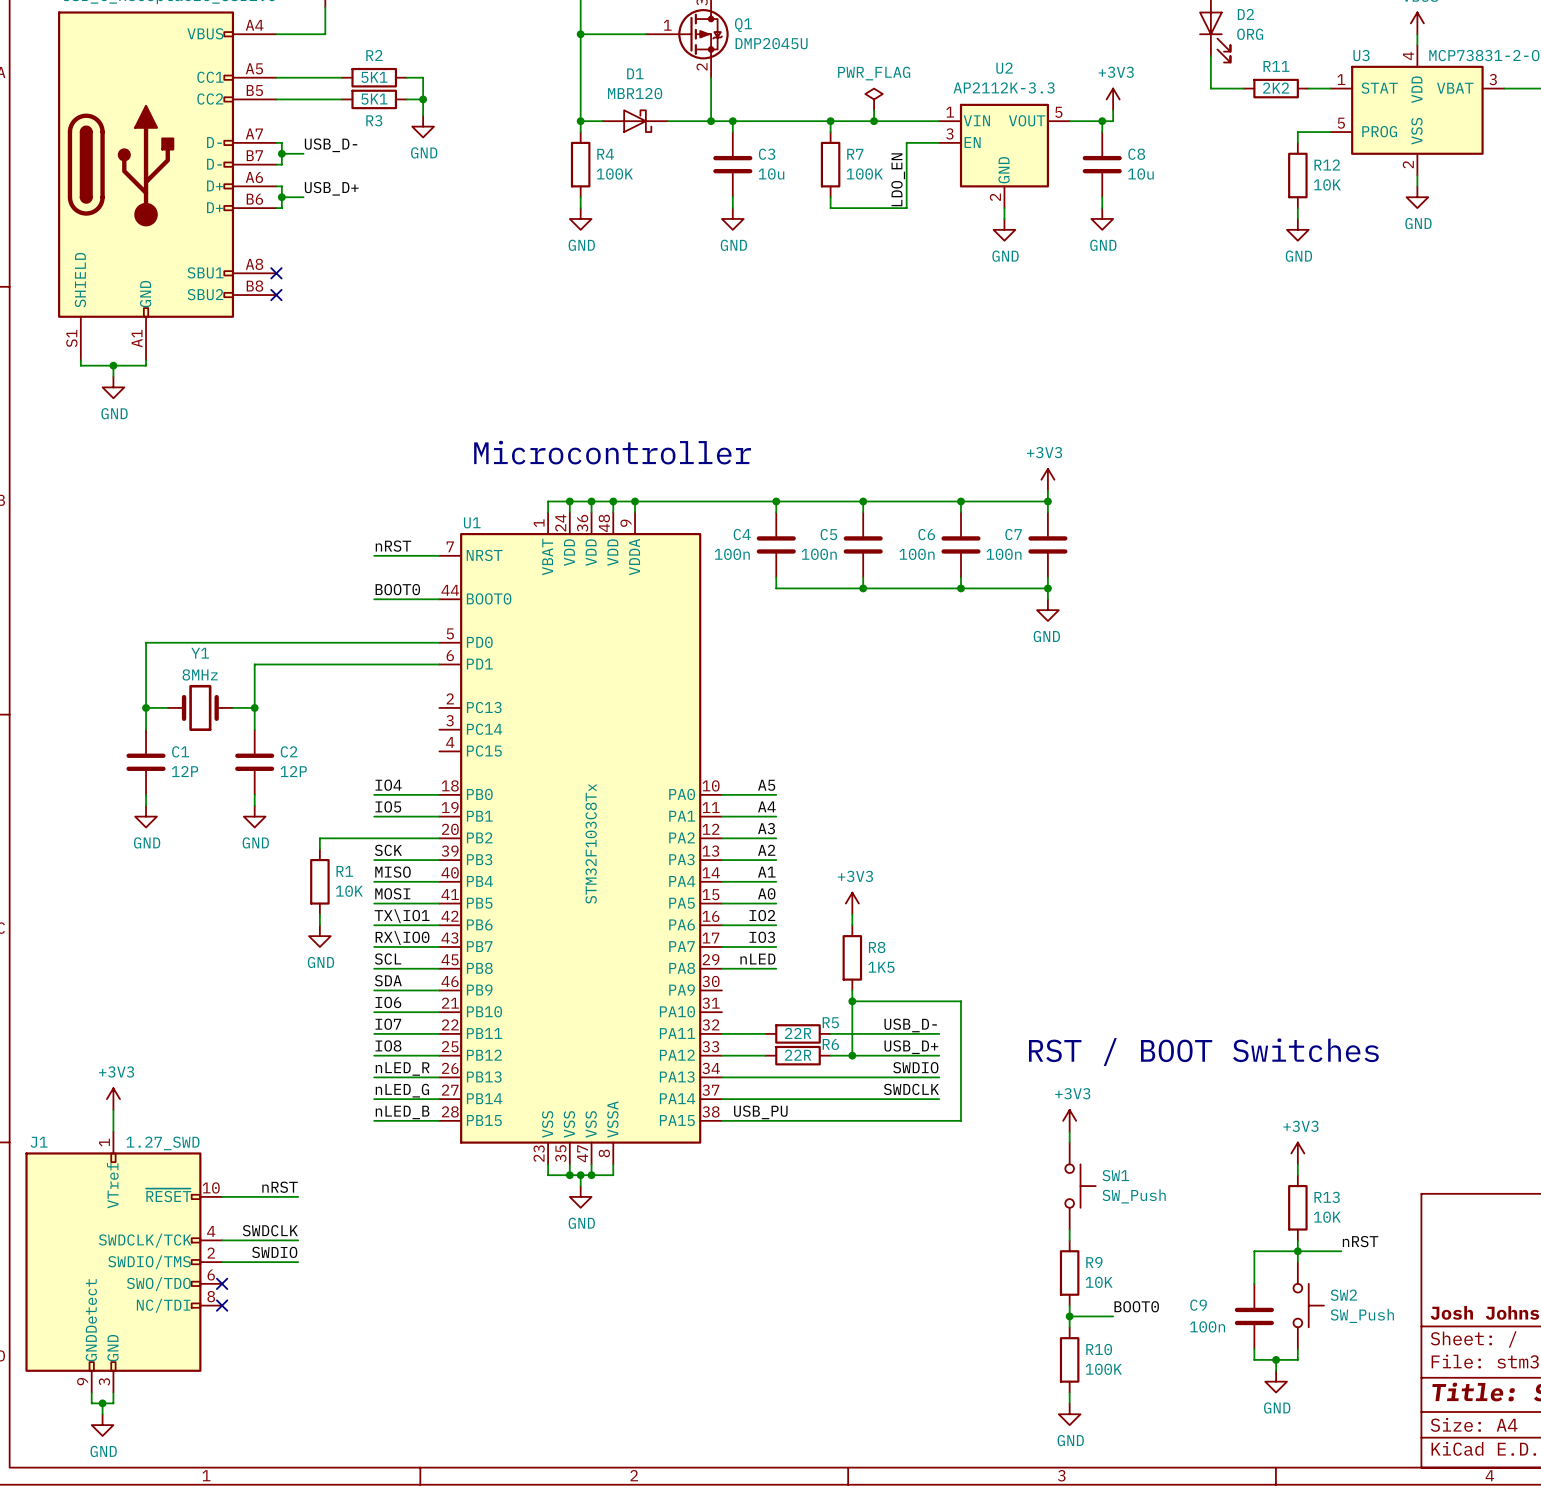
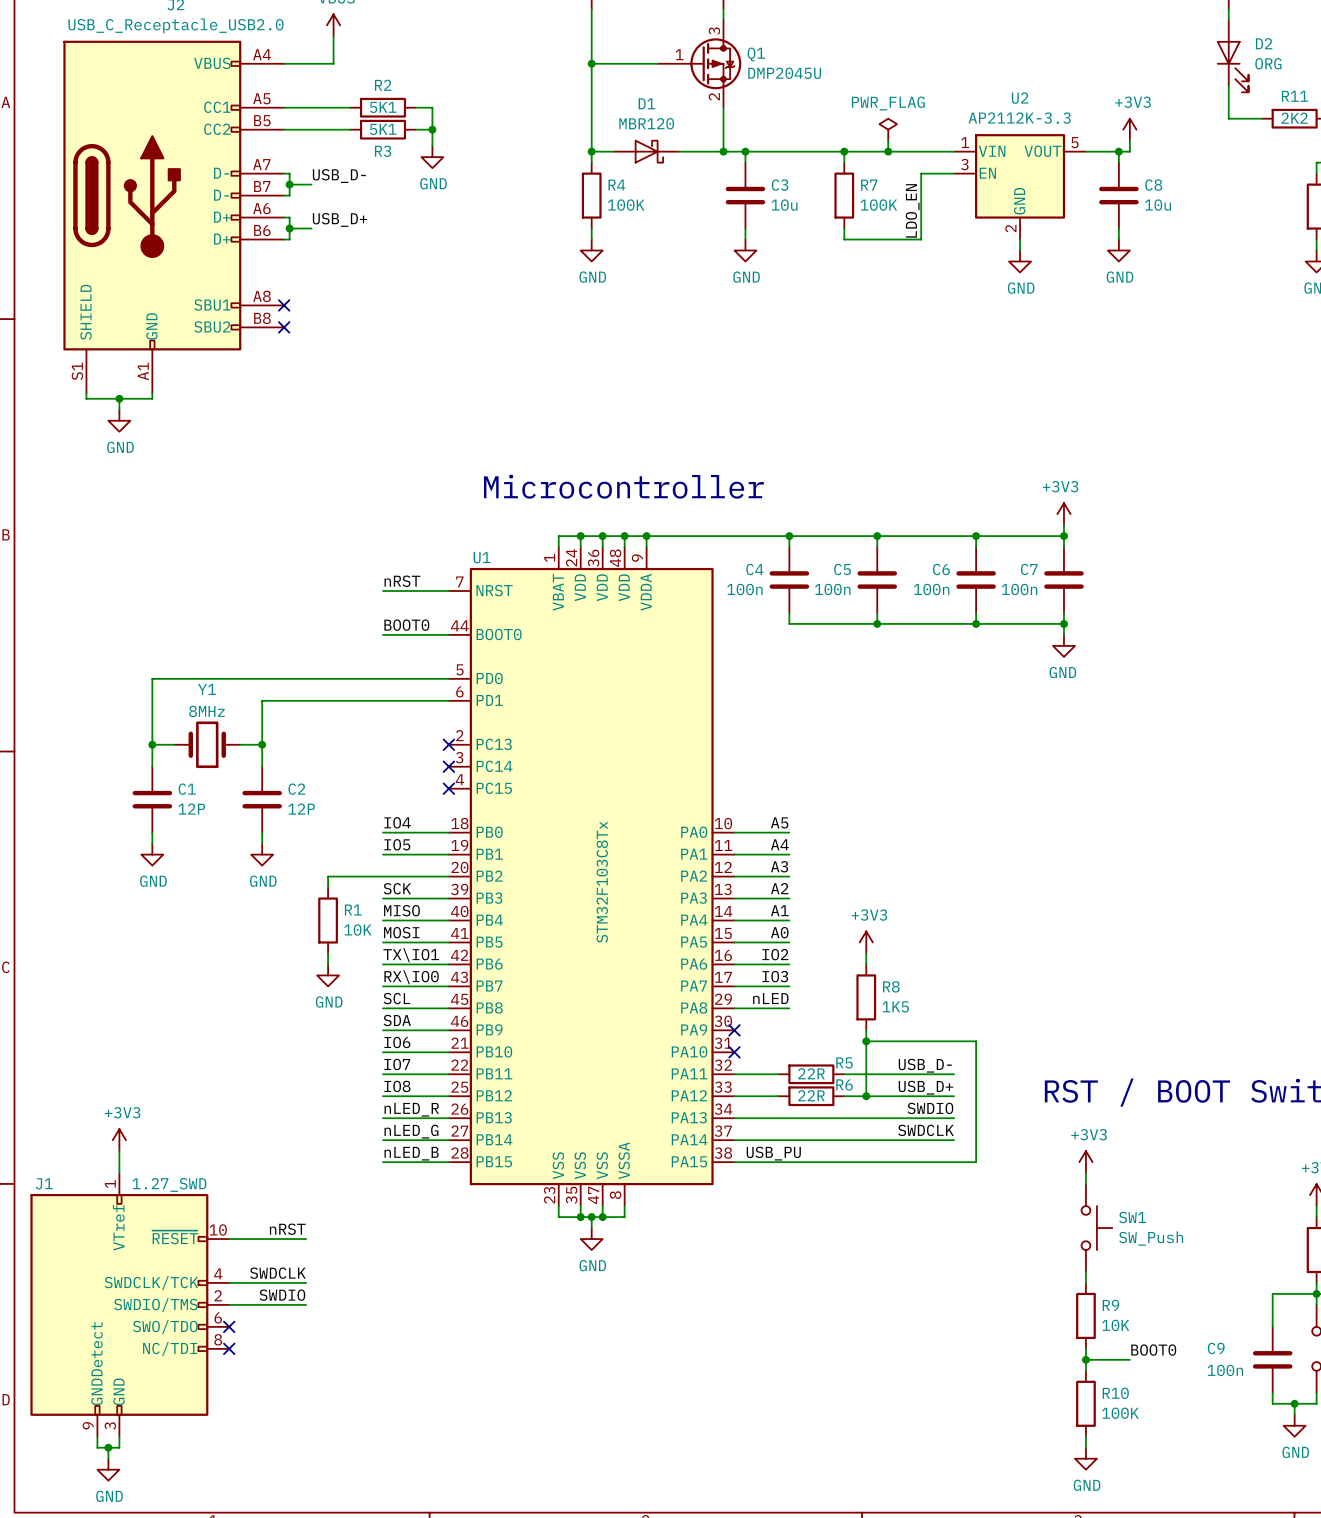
no-connect mark: none -> (448, 744)
no-connect mark: none -> (448, 766)
no-connect mark: none -> (448, 788)
no-connect mark: none -> (734, 1030)
no-connect mark: none -> (734, 1052)

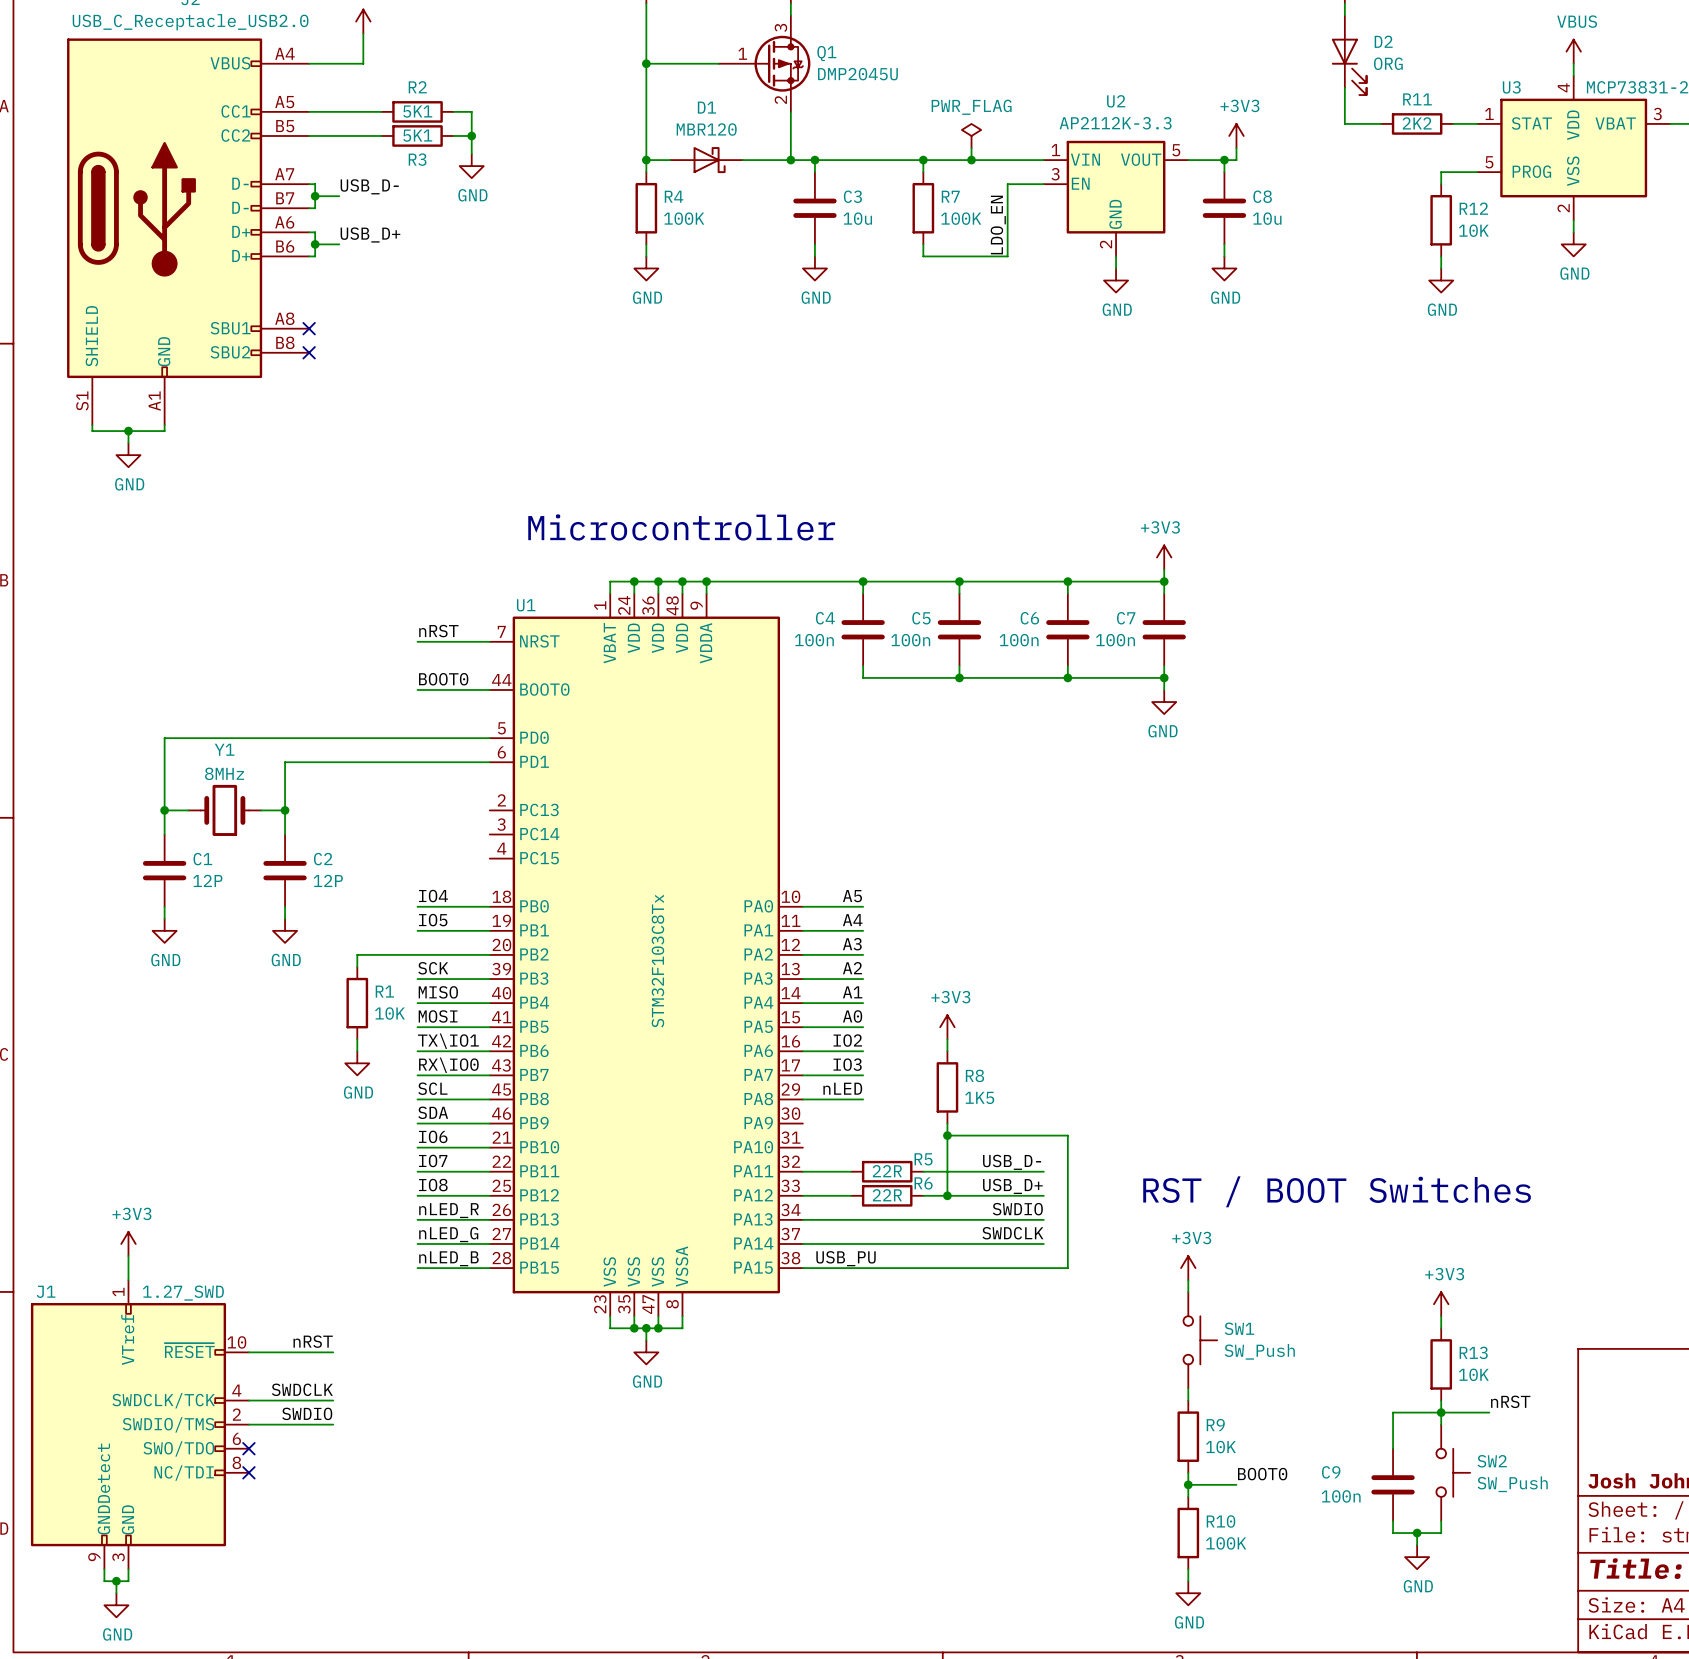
no-connect mark: (448, 744) -> none
no-connect mark: (448, 766) -> none
no-connect mark: (448, 788) -> none
no-connect mark: (734, 1030) -> none
no-connect mark: (734, 1052) -> none

